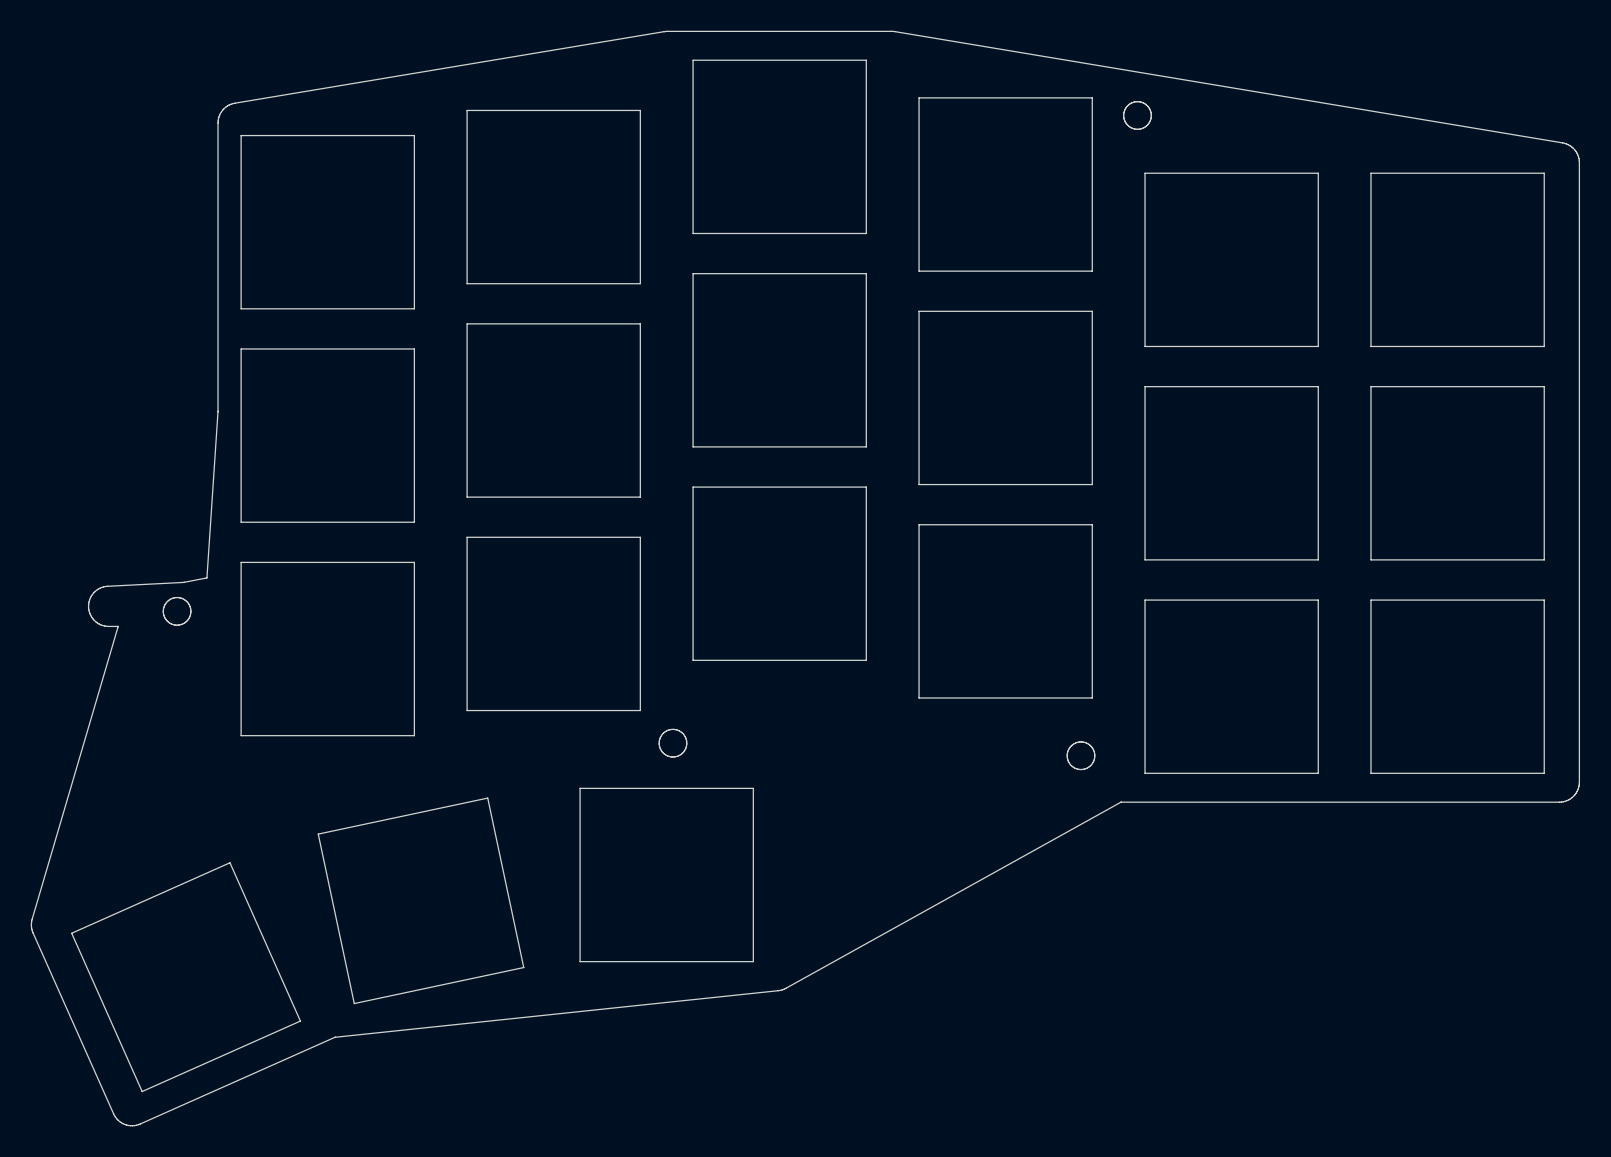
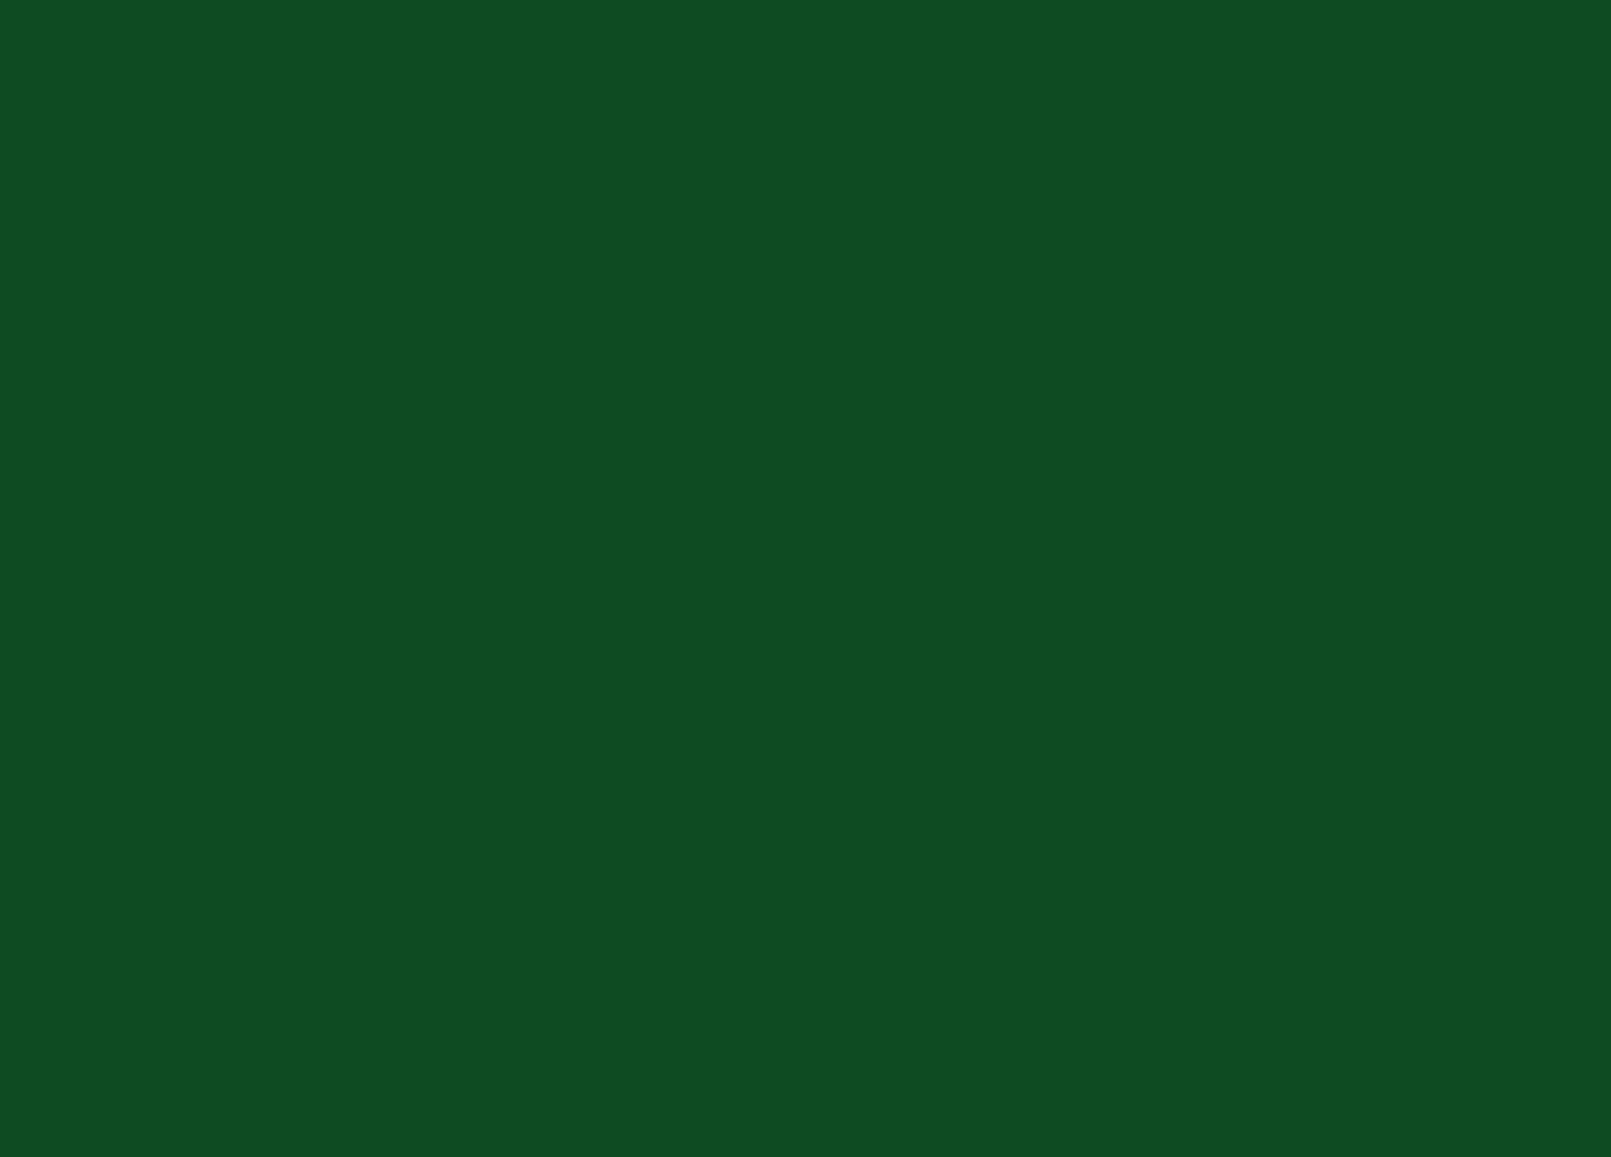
board edge: (891, 31) (1562, 142) (1574, 149) (1579, 162) (1579, 782) (1576, 793) (1568, 799) (1559, 802) (1120, 802) (782, 989) (334, 1037) (140, 1124) (128, 1125) (119, 1121) (113, 1113) (33, 933) (31, 923) (118, 626) (102, 625) (94, 620) (88, 609) (90, 598) (96, 590) (105, 586) (182, 582) (206, 577) (218, 411) (218, 123) (221, 111) (227, 106) (234, 103) (665, 31) (891, 31) -> none
board edge: (866, 60) (693, 60) (693, 233) (866, 233) (866, 60) -> none
board edge: (1092, 97) (919, 97) (919, 271) (1092, 271) (1092, 97) -> none
board edge: (1137, 101) (1147, 105) (1151, 115) (1147, 125) (1137, 129) (1127, 125) (1123, 115) (1127, 105) (1137, 101) -> none
board edge: (640, 110) (467, 110) (467, 283) (640, 283) (640, 110) -> none
board edge: (414, 135) (241, 135) (241, 308) (414, 308) (414, 135) -> none
board edge: (1318, 173) (1145, 173) (1145, 346) (1318, 346) (1318, 173) -> none
board edge: (1544, 173) (1370, 173) (1370, 346) (1544, 346) (1544, 173) -> none
board edge: (866, 273) (866, 446) (693, 446) (693, 273) (866, 273) -> none
board edge: (1092, 311) (1092, 484) (919, 484) (919, 311) (1092, 311) -> none
board edge: (640, 323) (640, 497) (467, 497) (467, 323) (640, 323) -> none
board edge: (414, 348) (414, 522) (241, 522) (241, 348) (414, 348) -> none
board edge: (1318, 386) (1145, 386) (1145, 559) (1318, 559) (1318, 386) -> none
board edge: (1544, 386) (1544, 559) (1370, 559) (1370, 386) (1544, 386) -> none
board edge: (866, 487) (866, 660) (693, 660) (693, 487) (866, 487) -> none
board edge: (1092, 524) (1092, 697) (919, 697) (919, 524) (1092, 524) -> none
board edge: (640, 537) (640, 710) (467, 710) (467, 537) (640, 537) -> none
board edge: (414, 562) (414, 735) (241, 735) (241, 562) (414, 562) -> none
board edge: (177, 597) (186, 601) (190, 611) (186, 621) (177, 625) (167, 621) (163, 611) (167, 601) (177, 597) -> none
board edge: (1318, 600) (1145, 600) (1145, 773) (1318, 773) (1318, 600) -> none
board edge: (1544, 600) (1544, 773) (1370, 773) (1370, 600) (1544, 600) -> none
board edge: (672, 729) (682, 733) (686, 743) (682, 752) (672, 756) (663, 752) (659, 743) (663, 733) (672, 729) -> none
board edge: (1080, 741) (1090, 745) (1094, 755) (1090, 765) (1080, 769) (1071, 765) (1067, 755) (1071, 745) (1080, 741) -> none
board edge: (753, 788) (580, 788) (580, 961) (753, 961) (753, 788) -> none
board edge: (487, 798) (523, 967) (354, 1003) (318, 834) (487, 798) -> none
board edge: (229, 862) (300, 1021) (142, 1091) (71, 933) (229, 862) -> none

